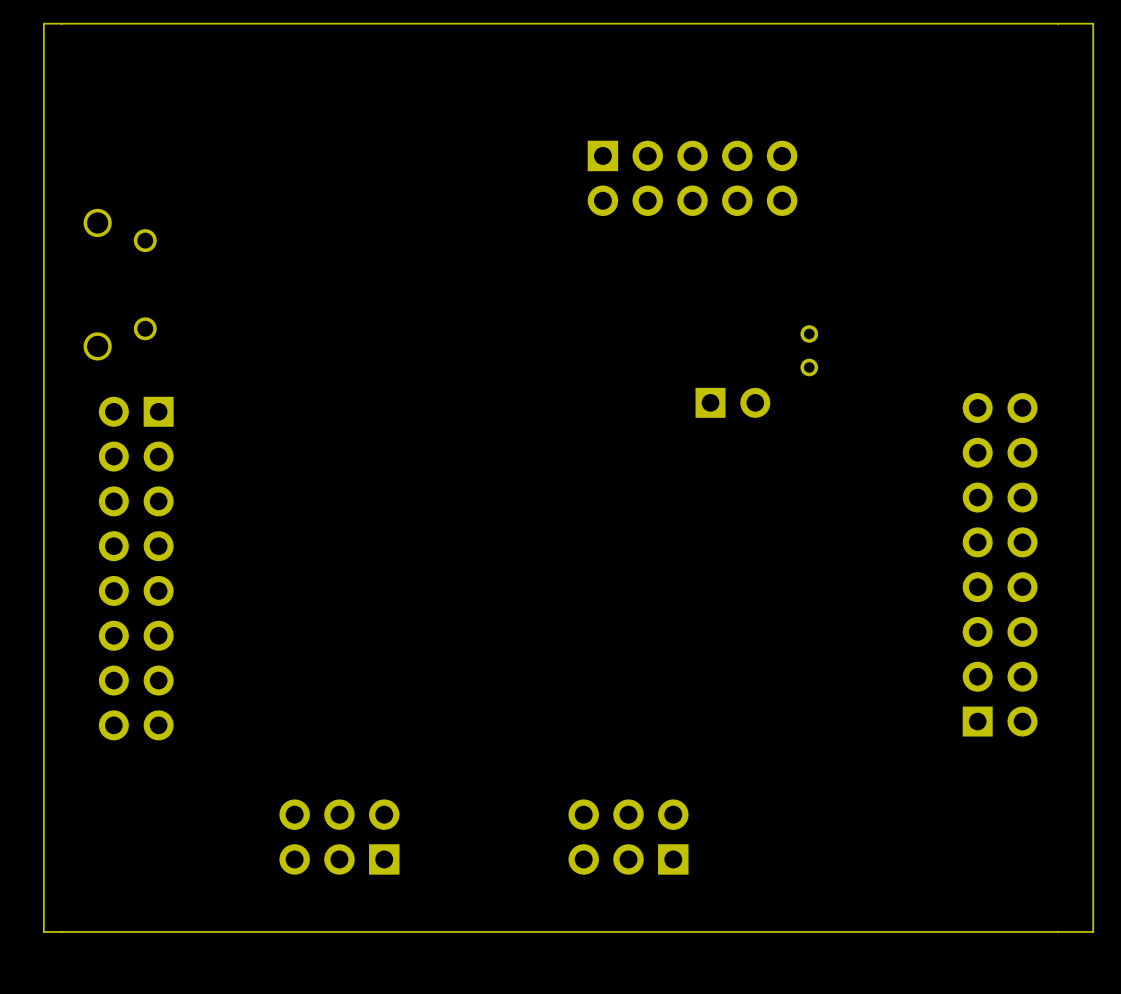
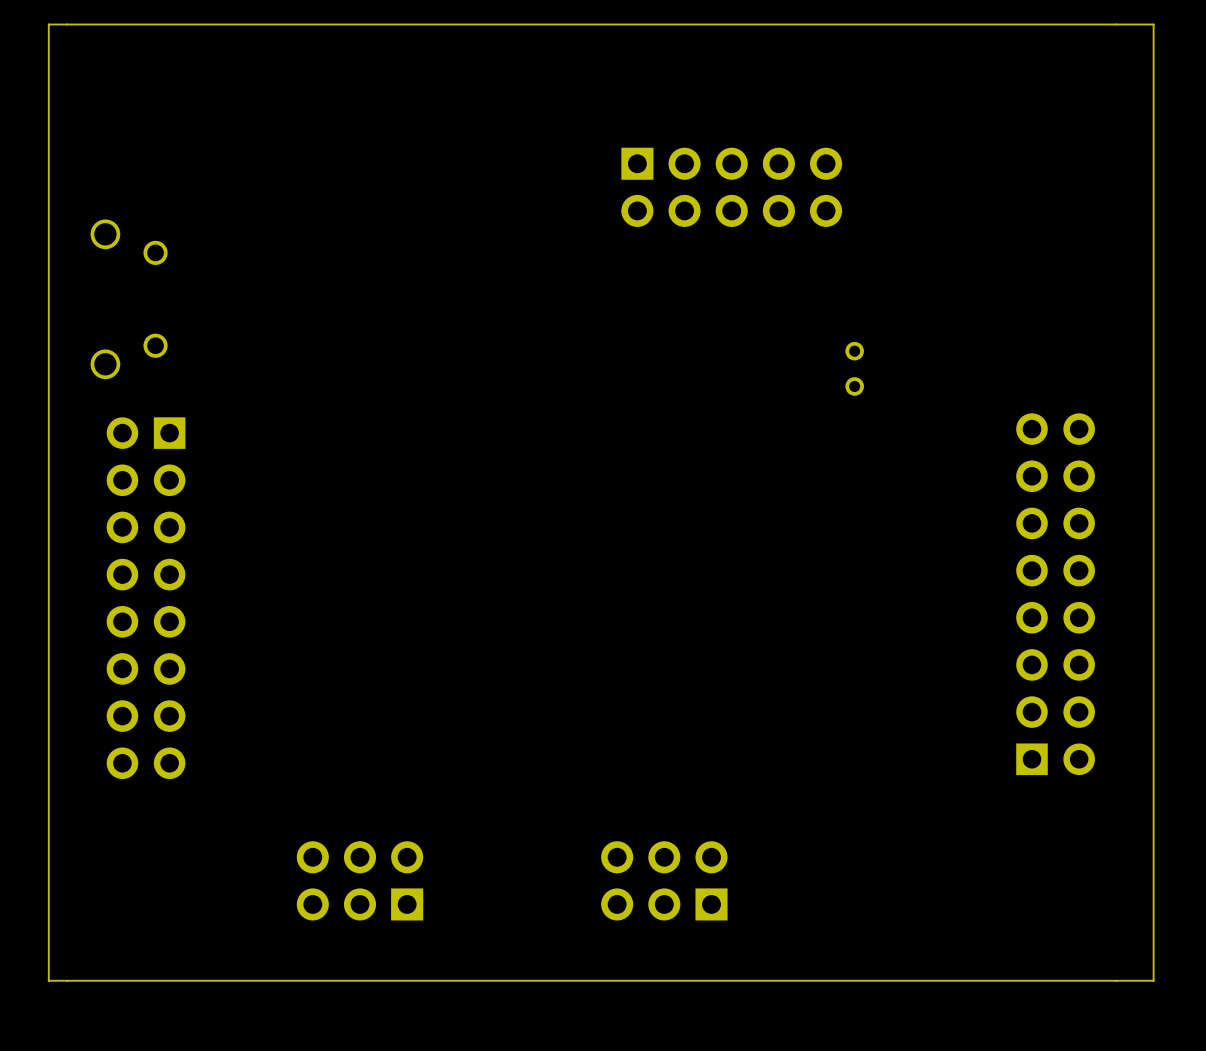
part: (732, 402) -> none

